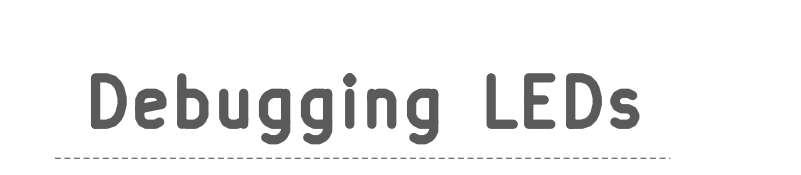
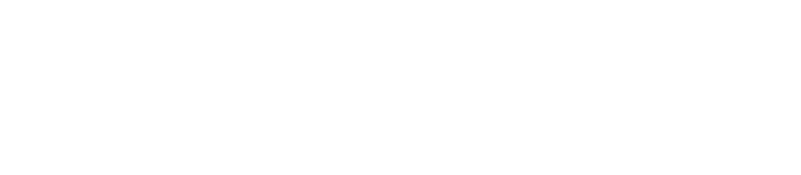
text: Debugging LEDs (365, 108) -> none
line: (54, 158) (670, 158) -> none

